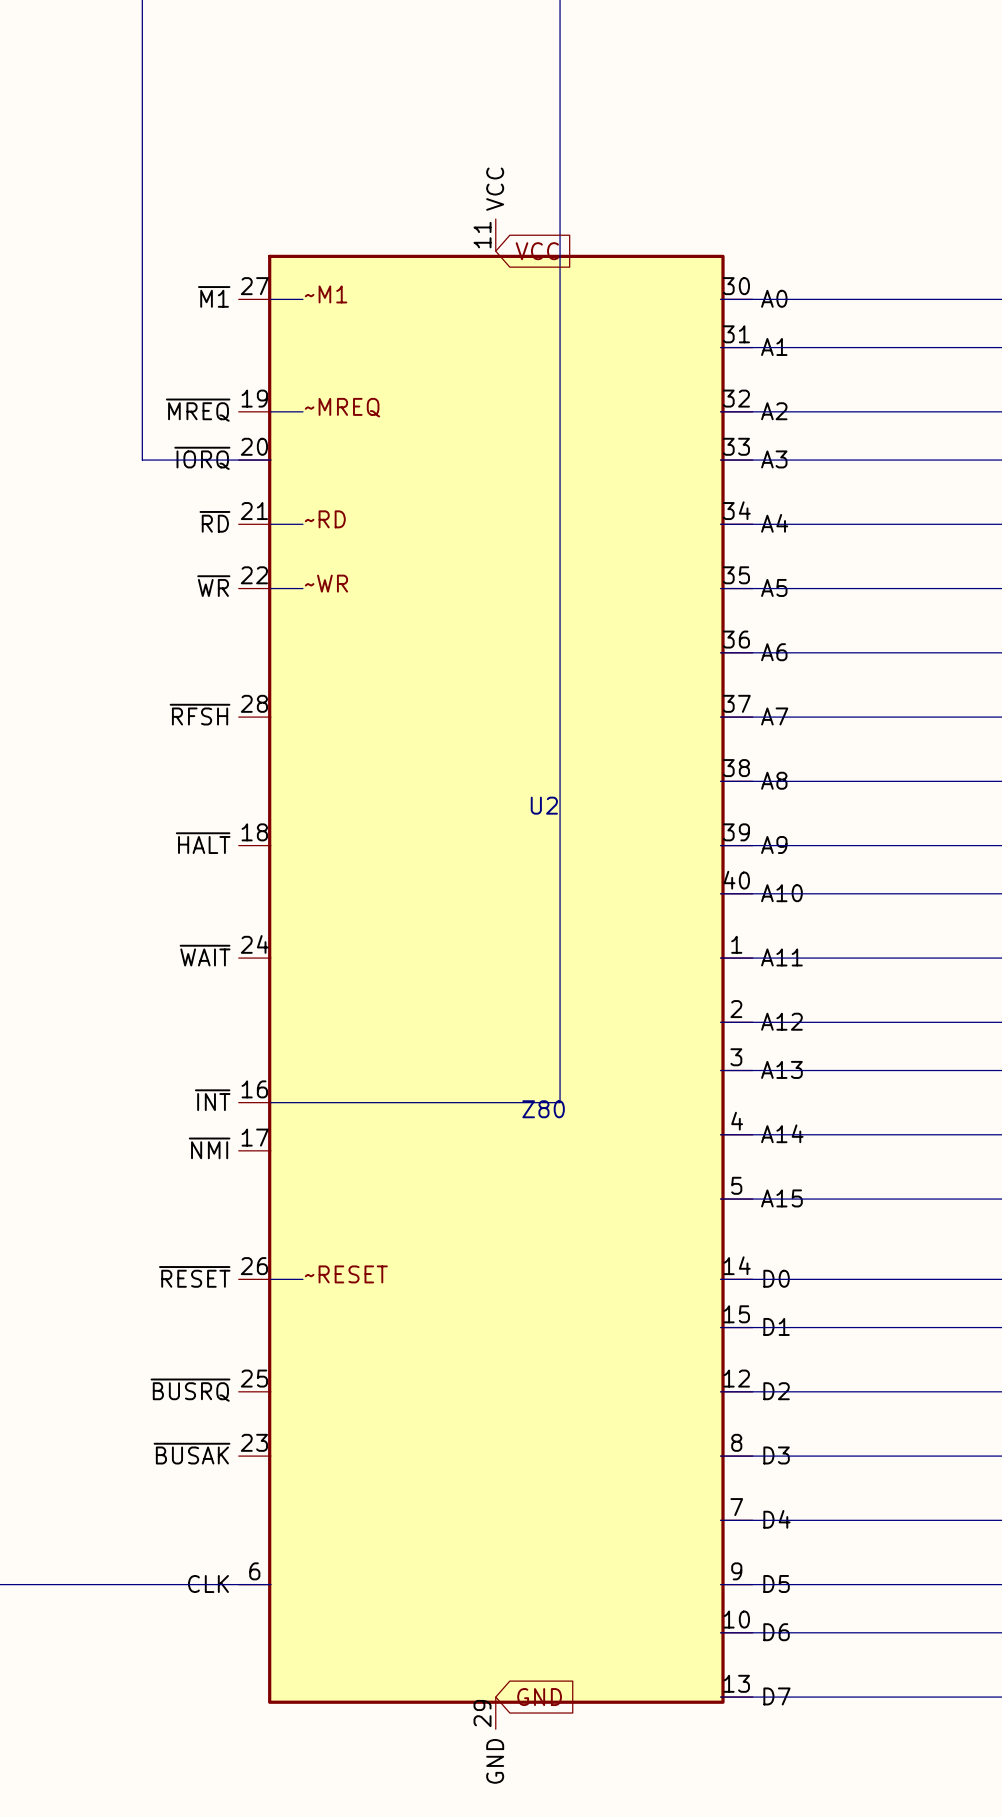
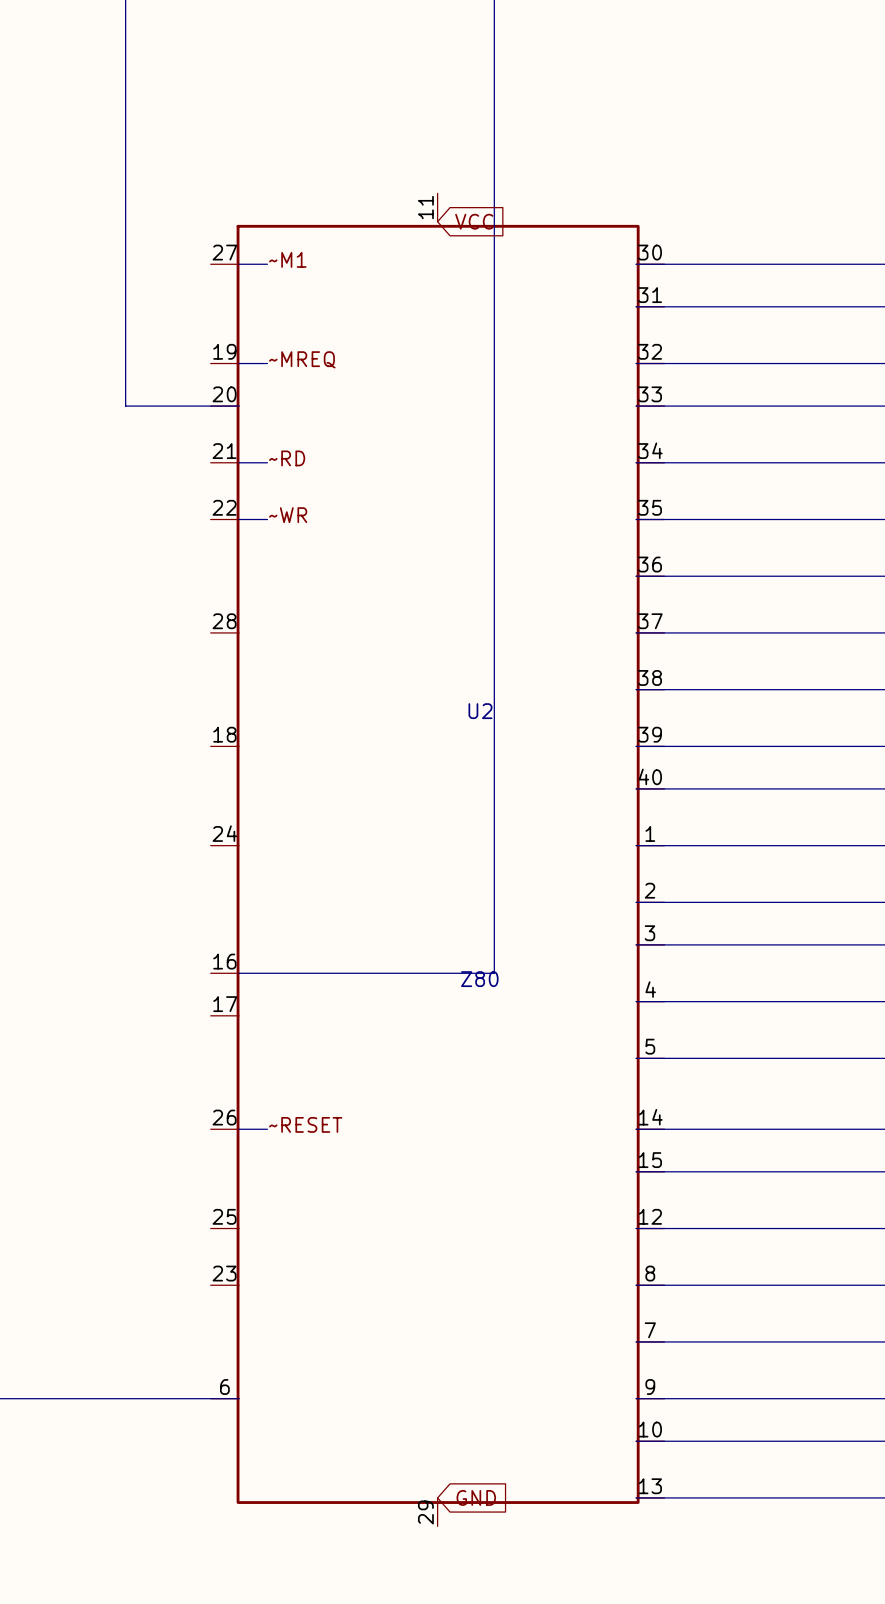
U2 symbol: [238, 219, 753, 1730] -> [210, 193, 665, 1527]

